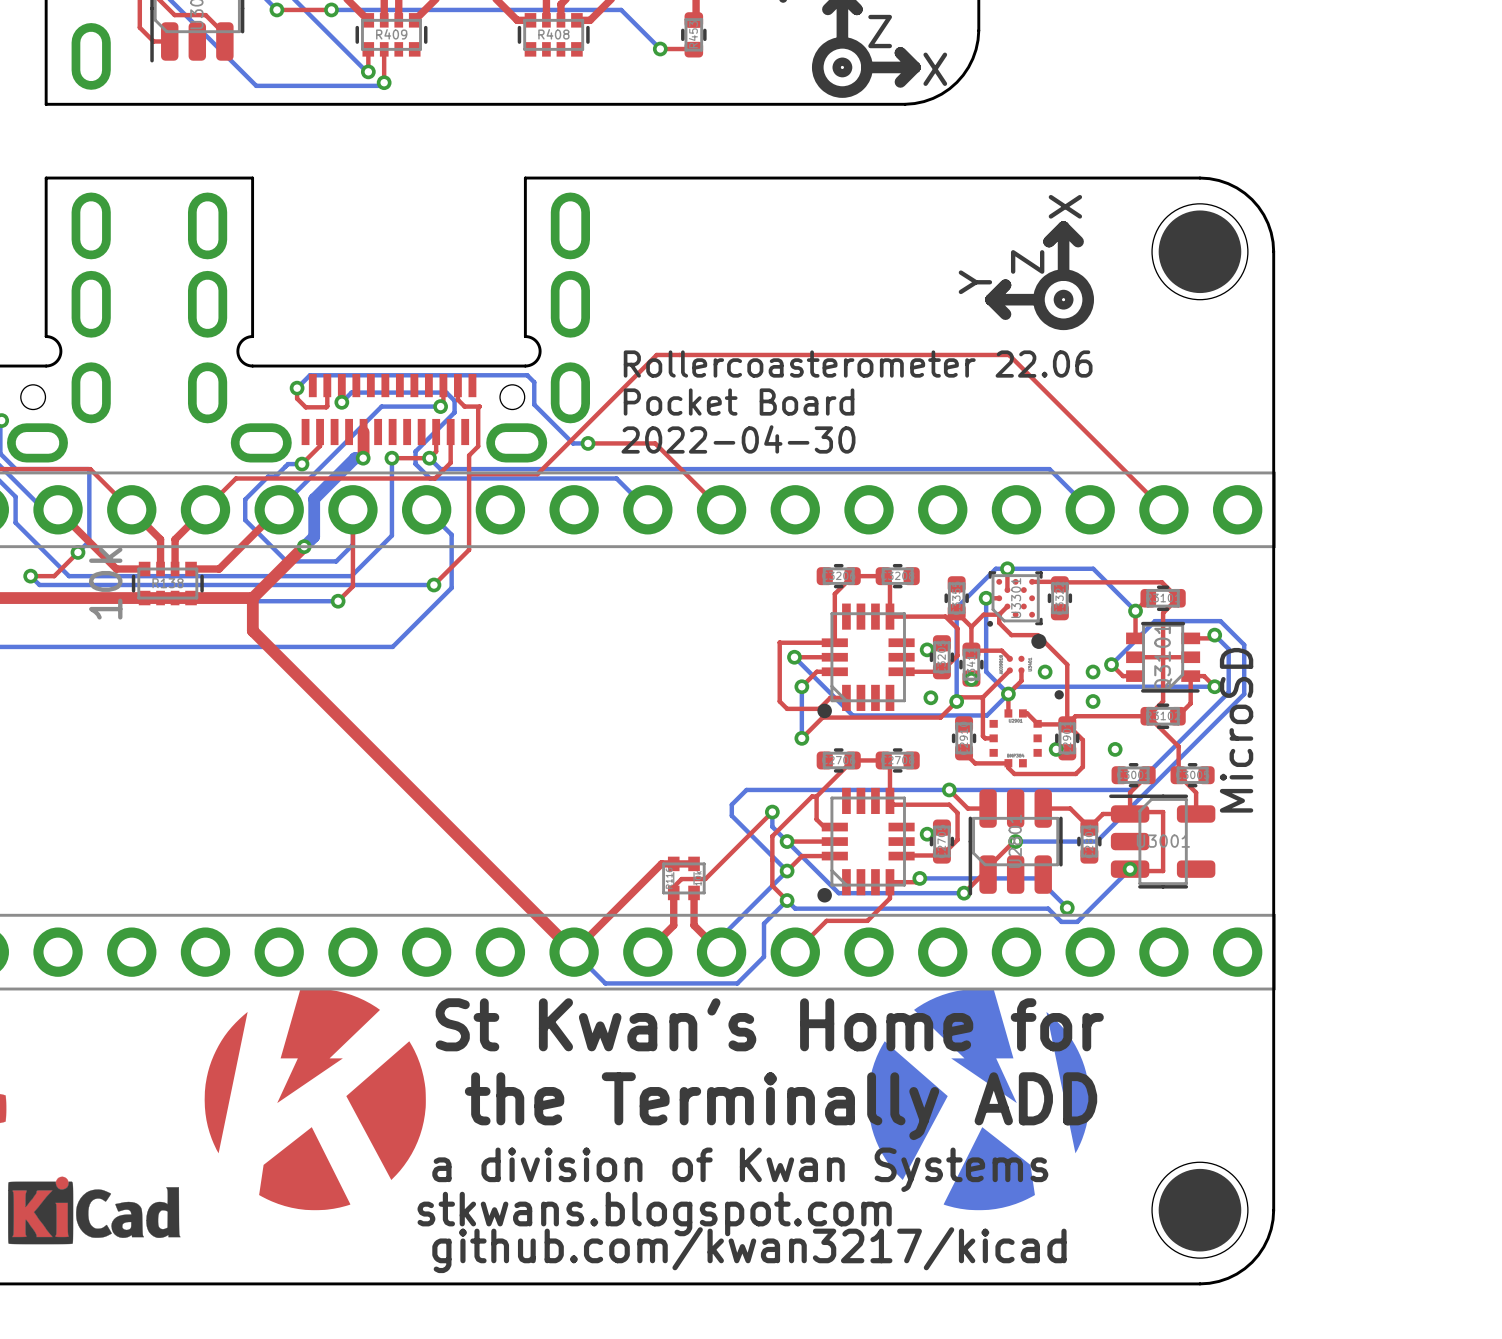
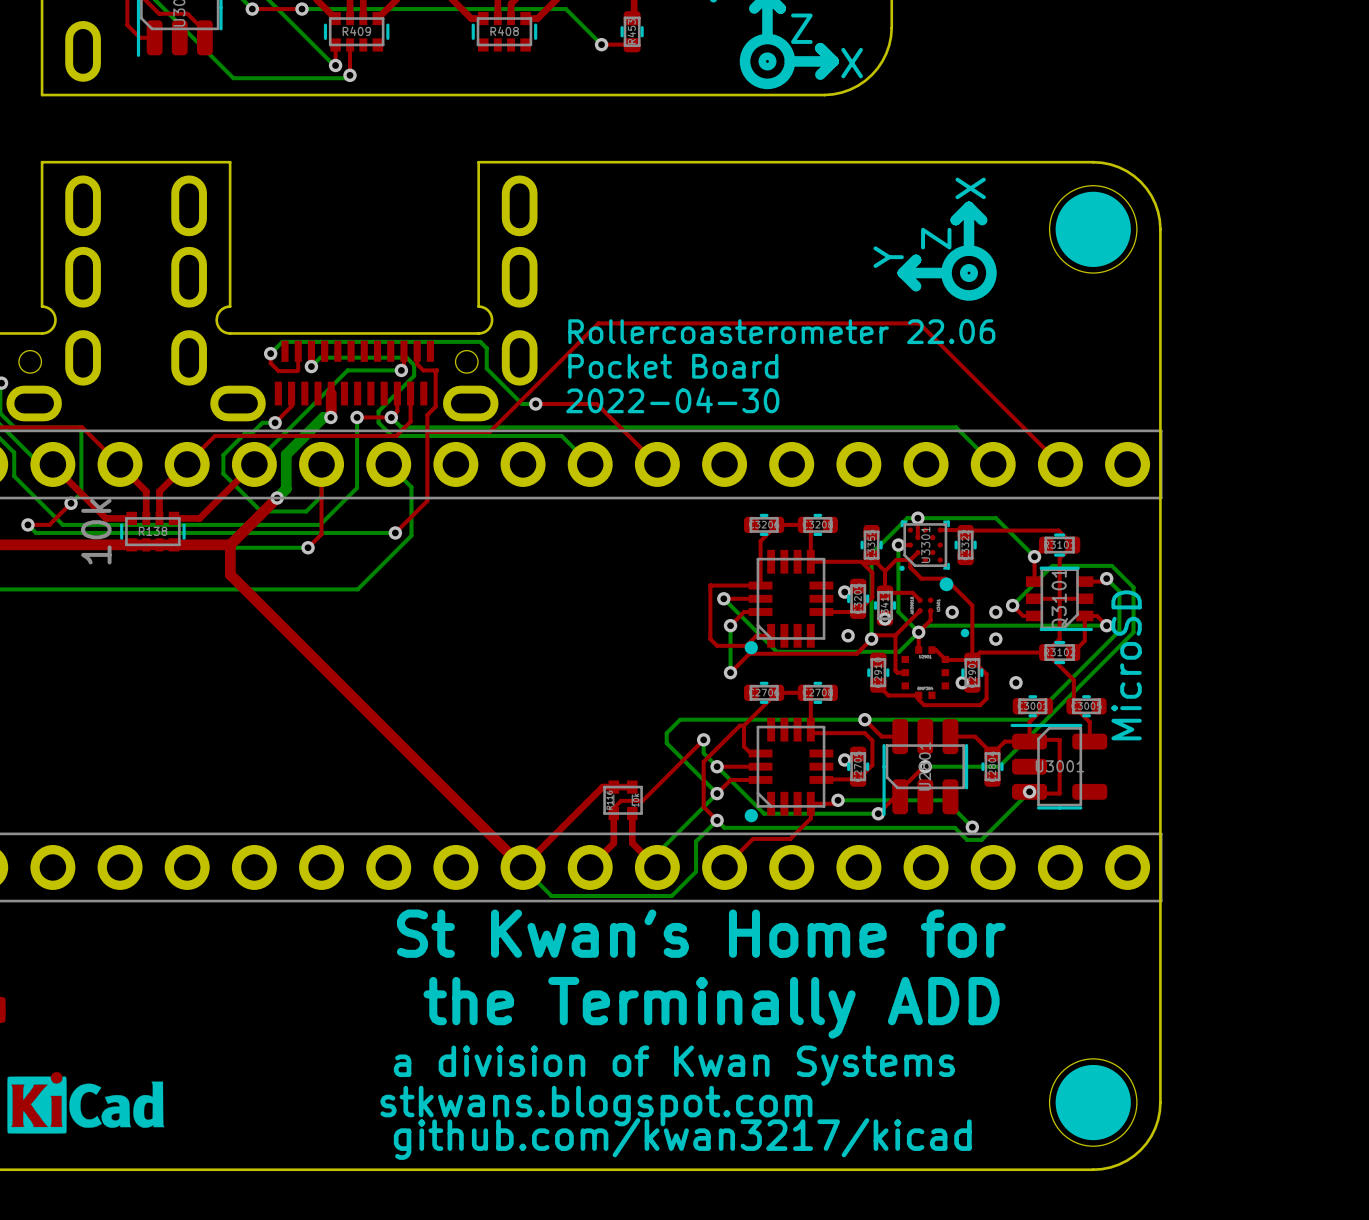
drawing: [204, 988, 1090, 1211] -> none
drawing: none -> [380, 909, 1006, 1160]

